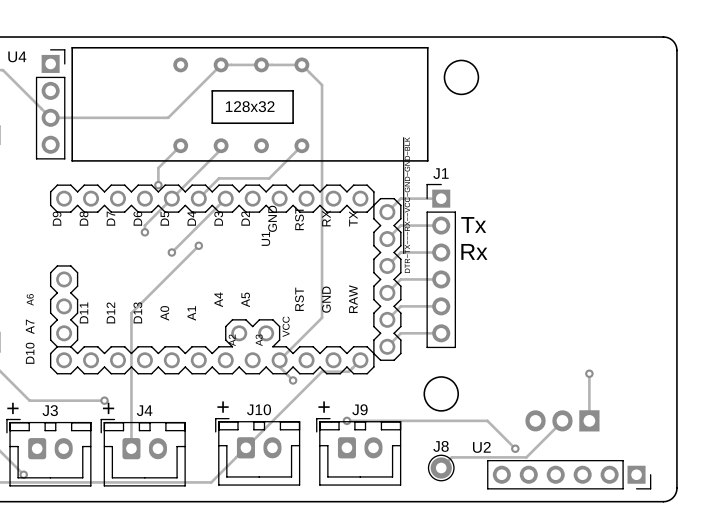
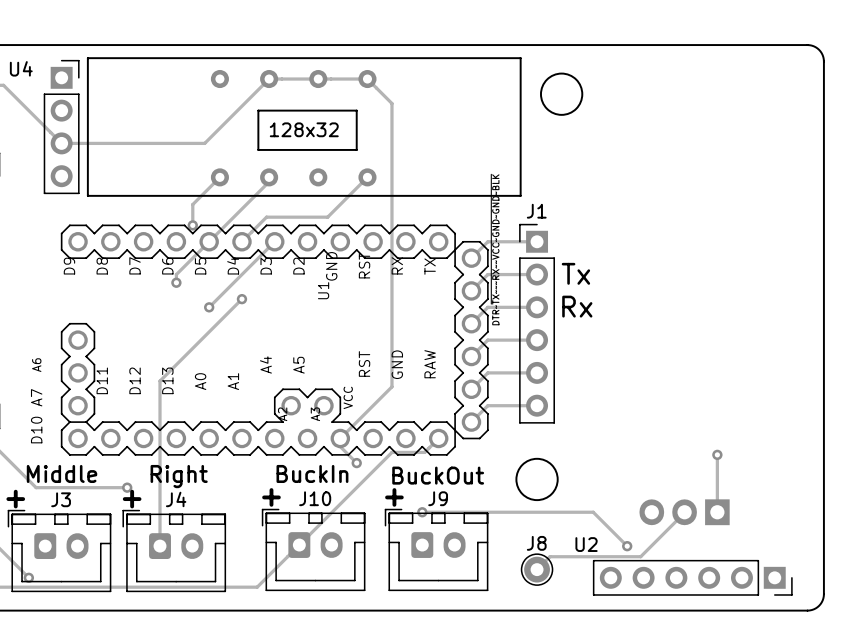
text: none -> Middle (62, 473)
text: none -> BuckIn (312, 473)
text: none -> Right (179, 476)
text: none -> BuckOut (438, 475)

